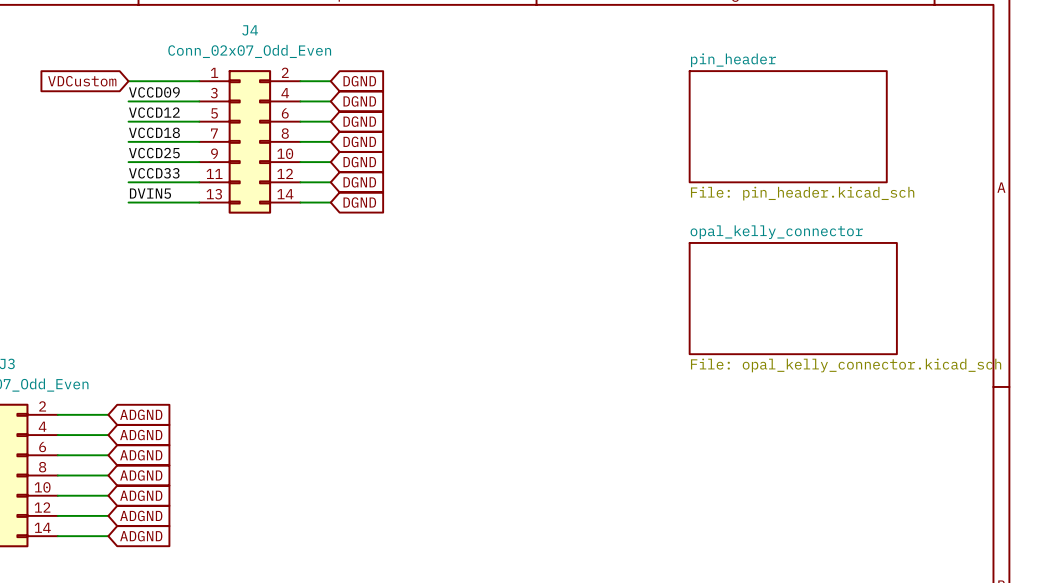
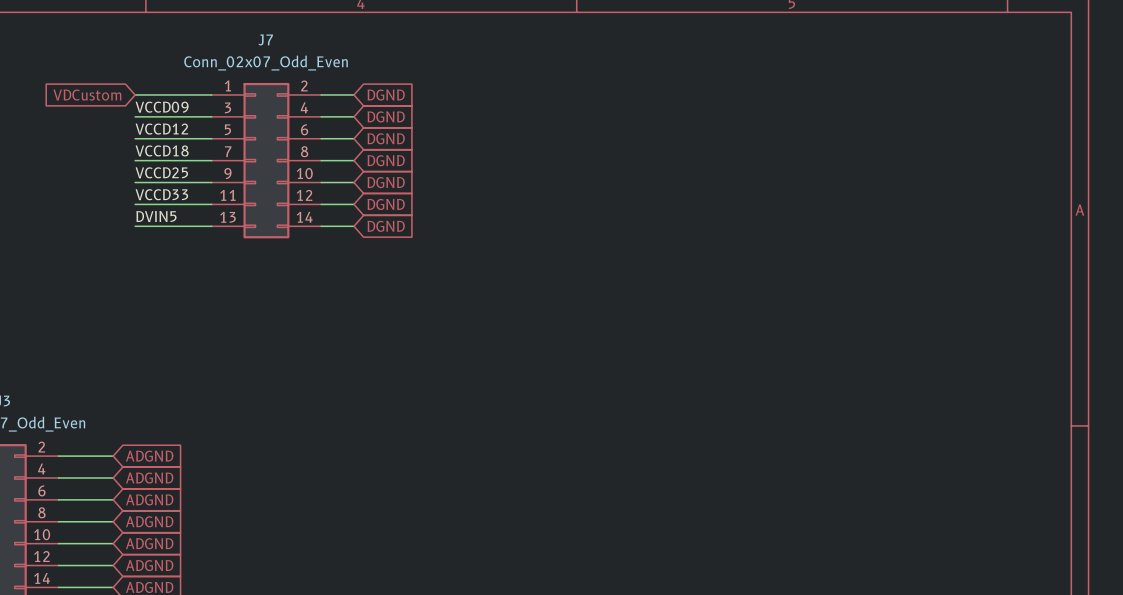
J4 name: J4 (250, 30) -> J7 (265, 39)
sheet pin_header: File: pin_header.kicad_sch (788, 126) -> none
sheet opal_kelly_connector: File: opal_kelly_connector.kicad_sch (793, 298) -> none

